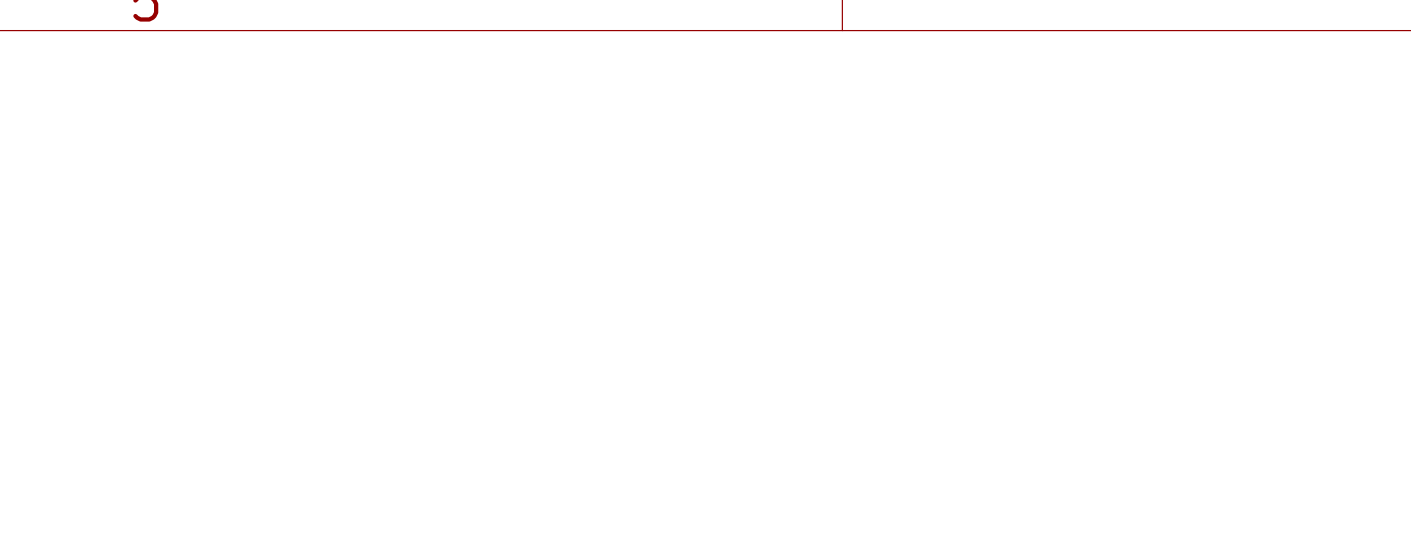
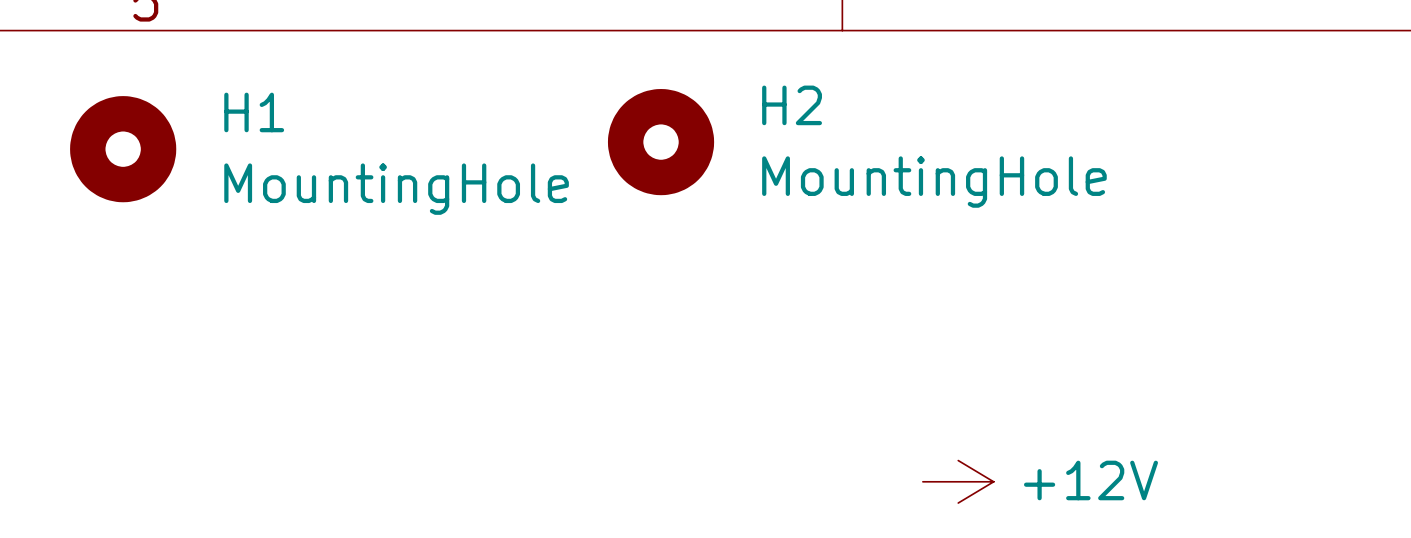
H2: none -> MountingHole (661, 142)
H1: none -> MountingHole (123, 149)
power symbol: none -> +12V (958, 481)

